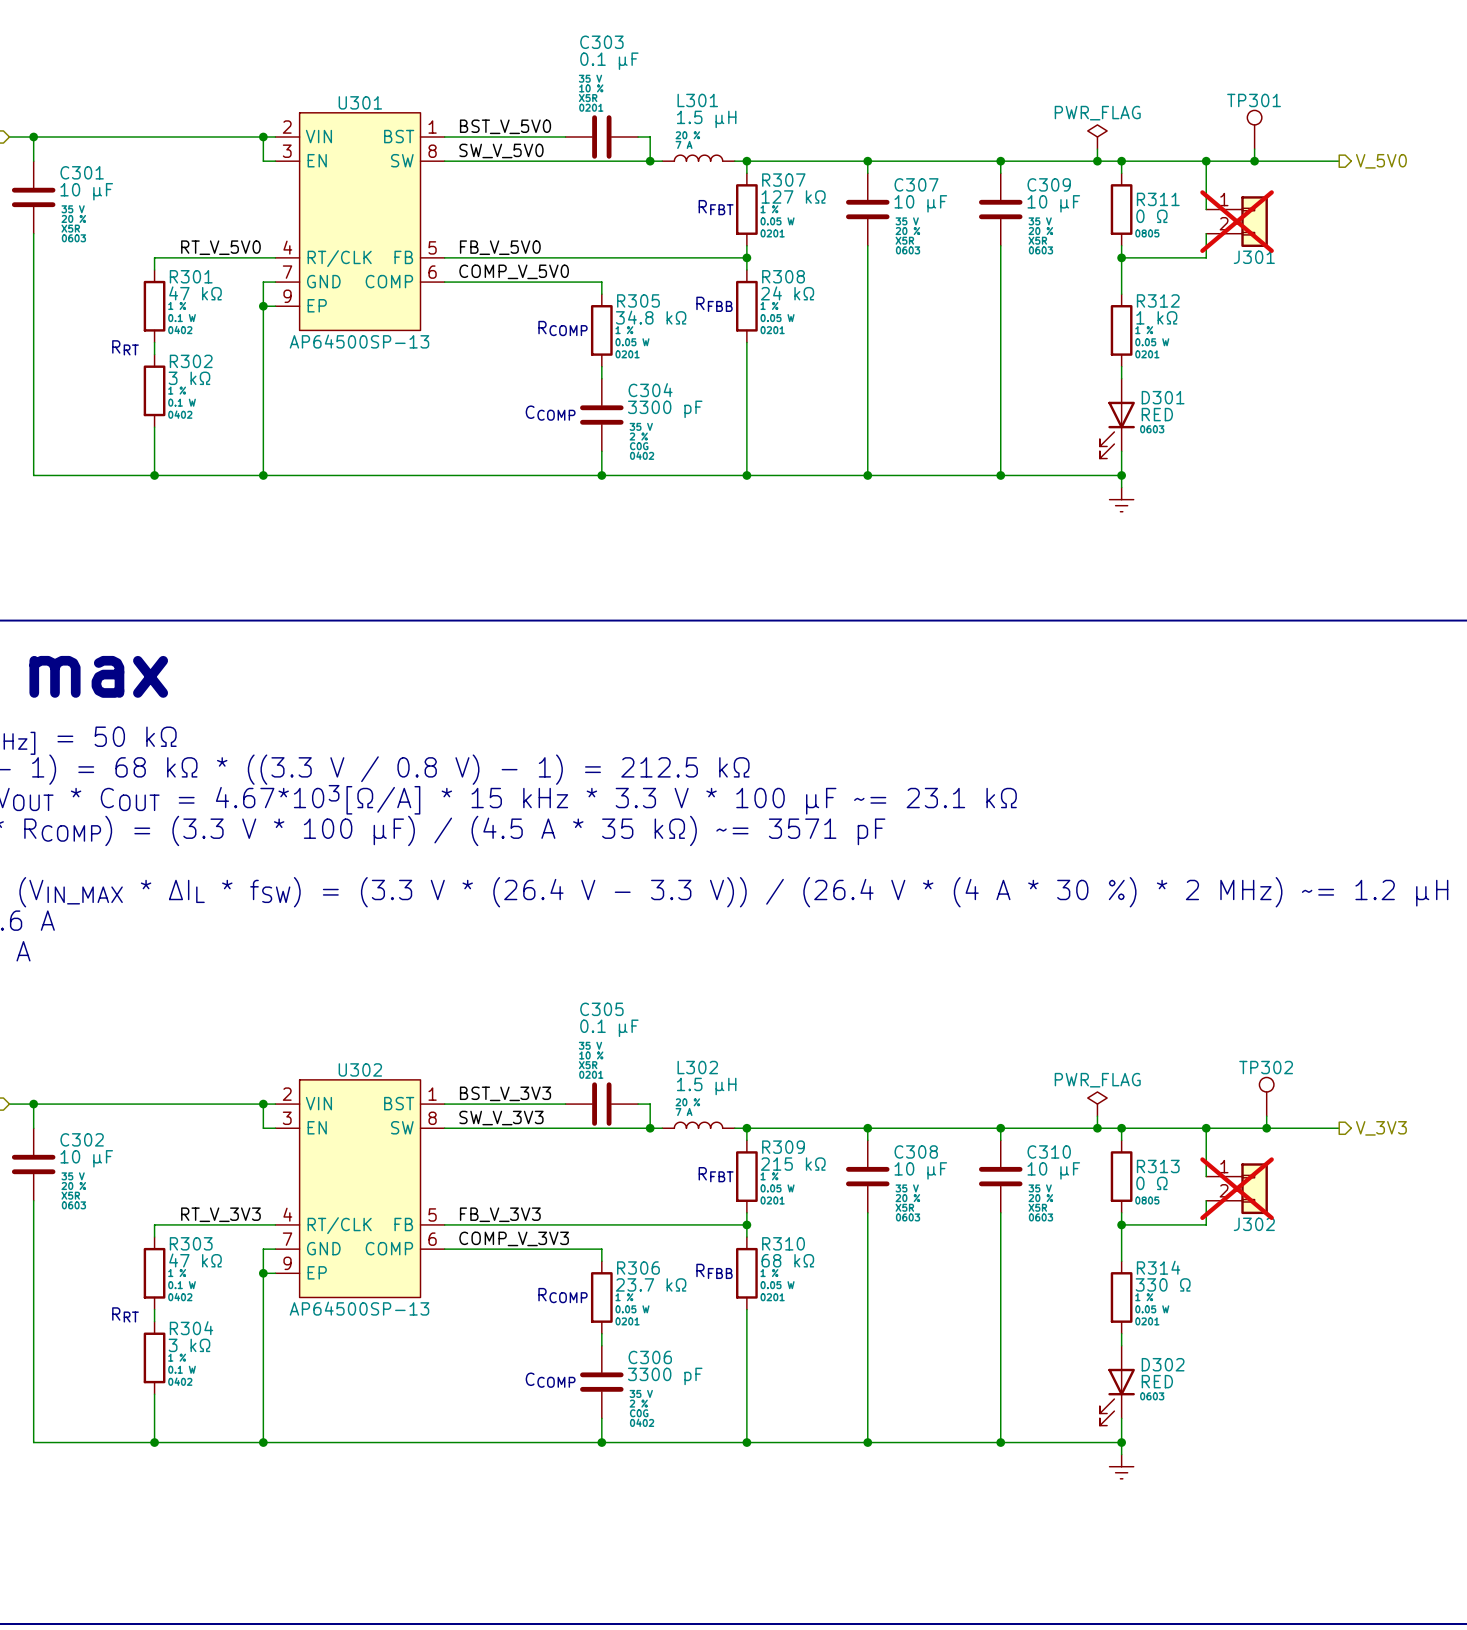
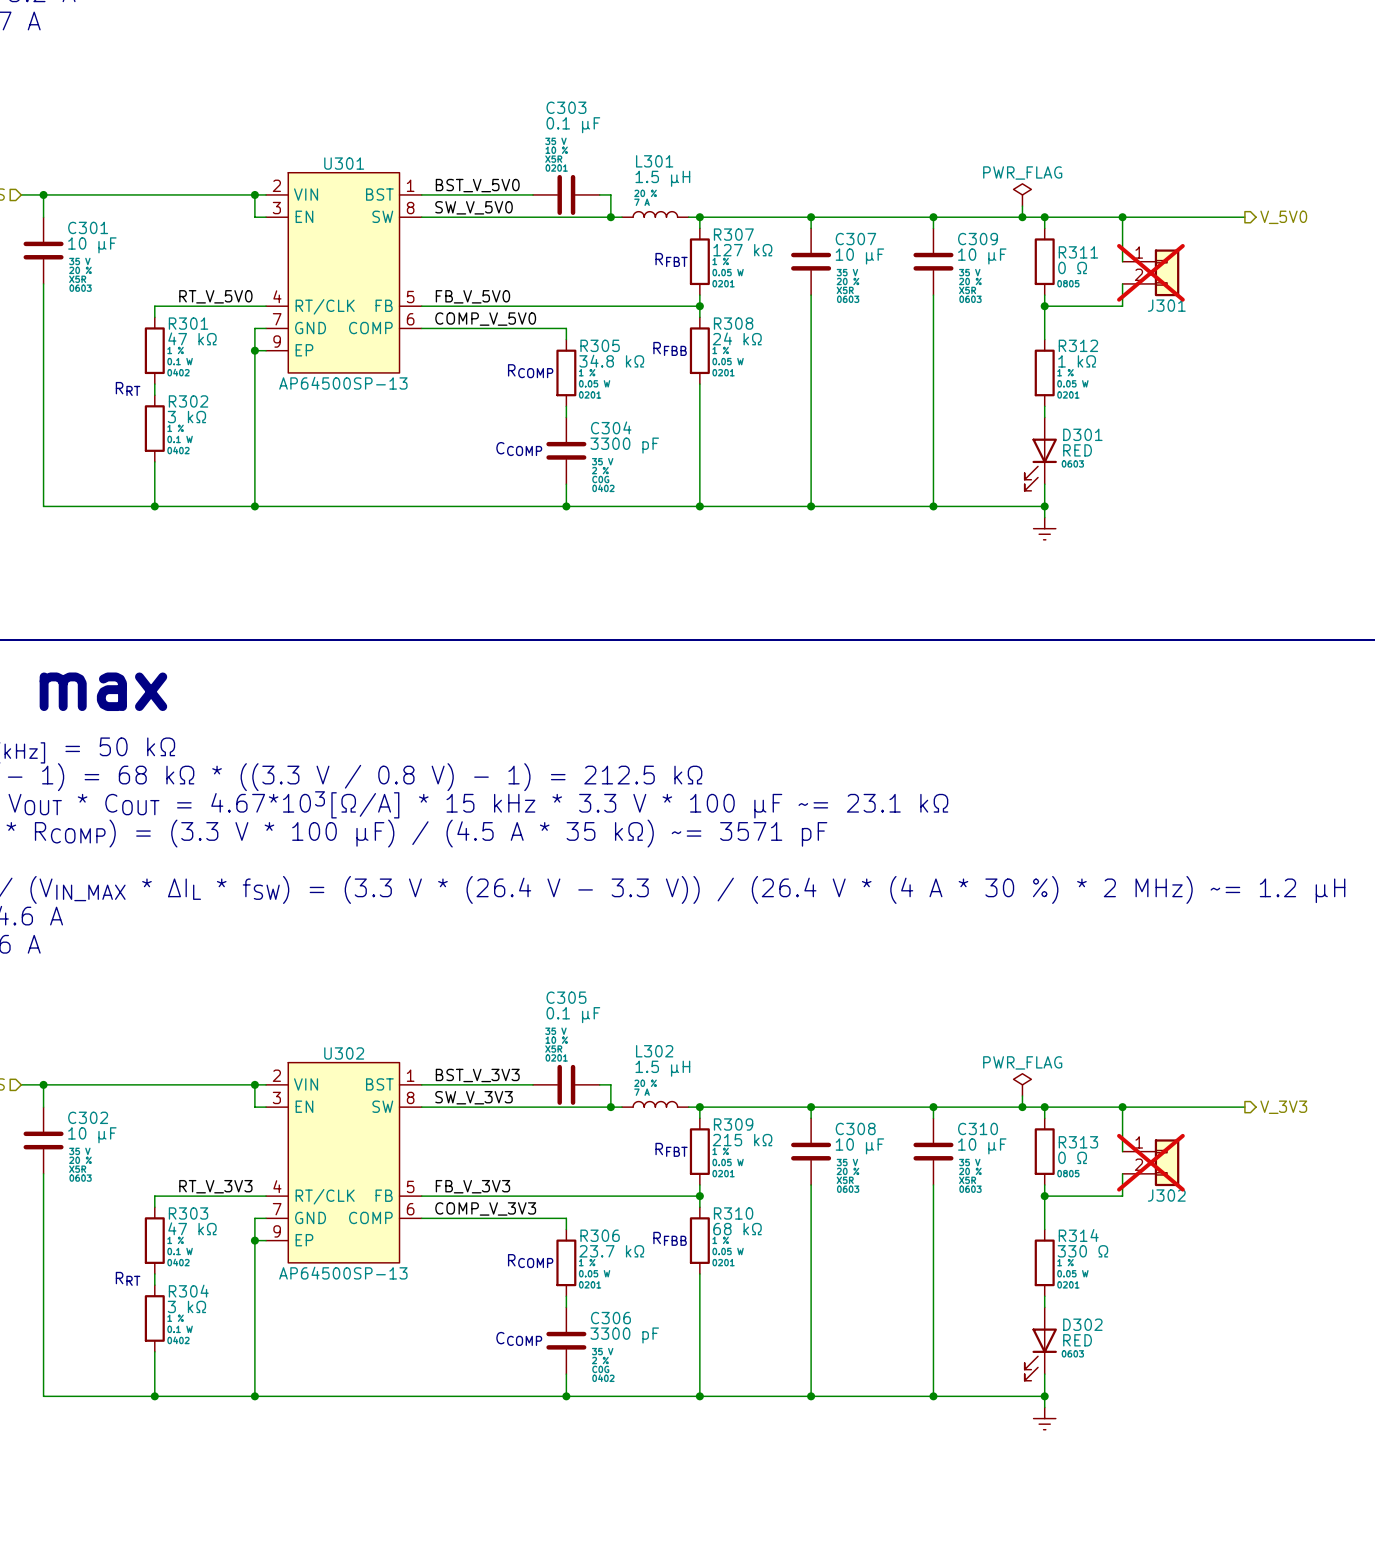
TP301: (1254, 129) -> none
wire: (1254, 149) (1254, 161) -> none
junction: (1254, 161) -> none
TP302: (1266, 1096) -> none
wire: (1266, 1116) (1266, 1128) -> none
junction: (1266, 1128) -> none

